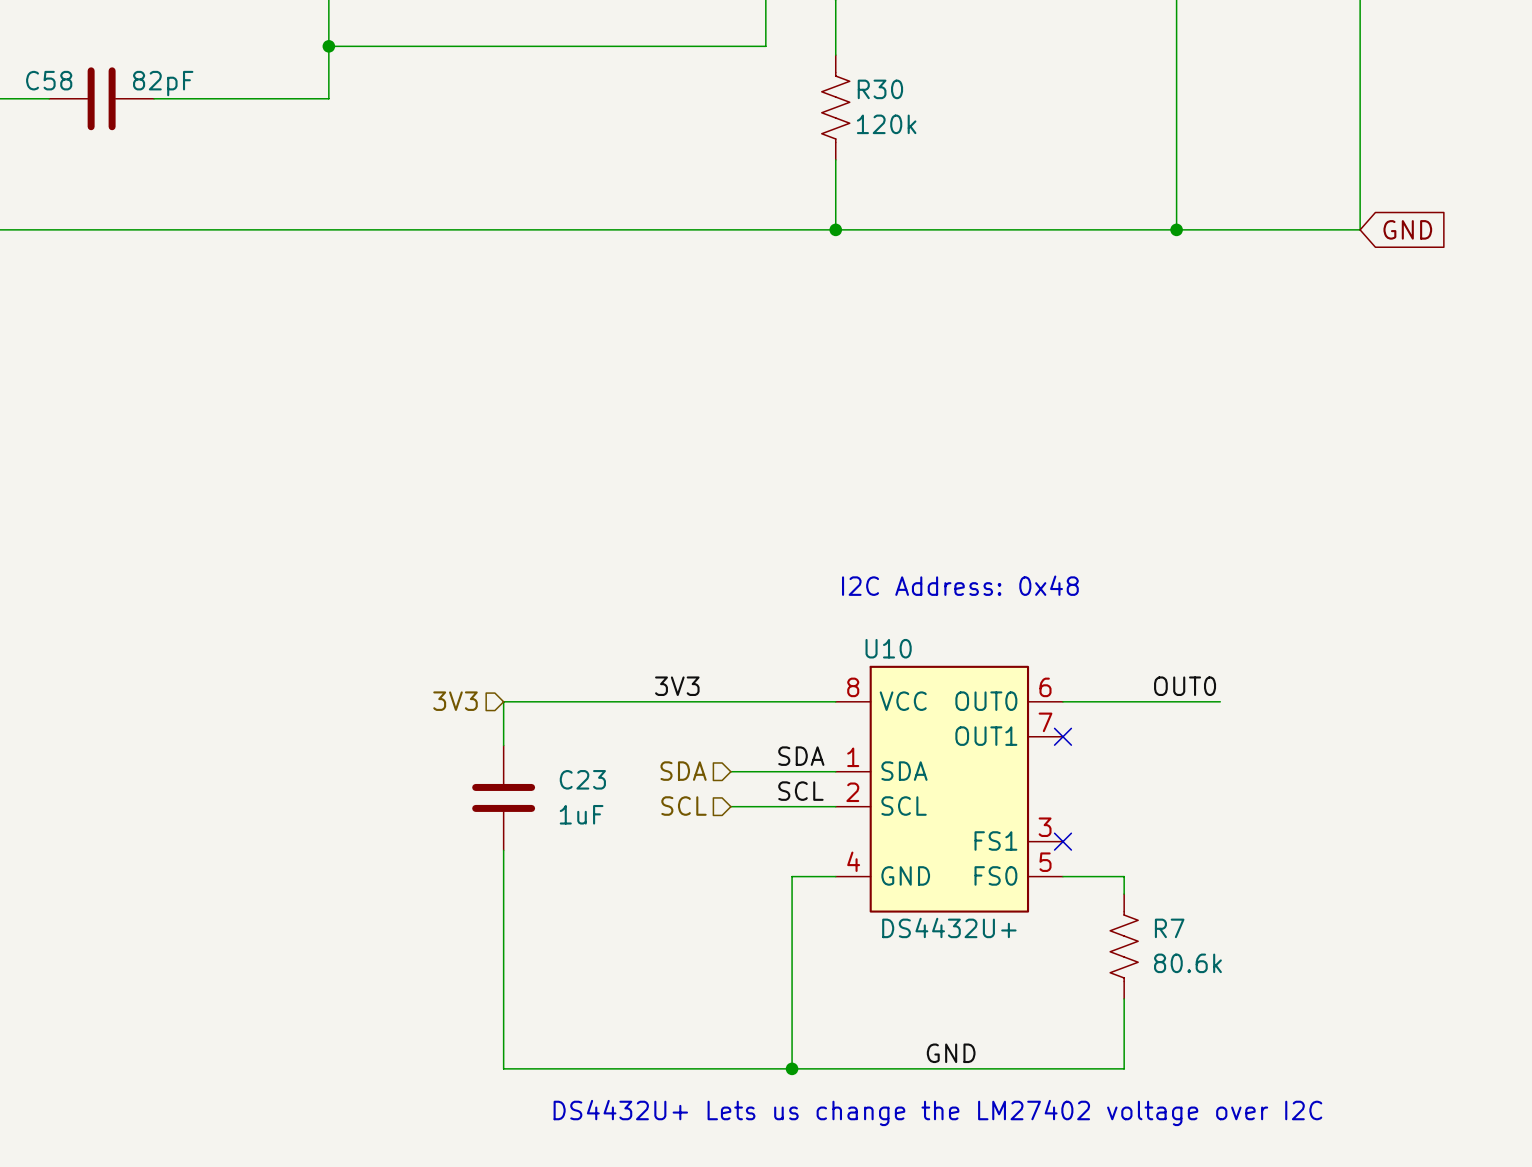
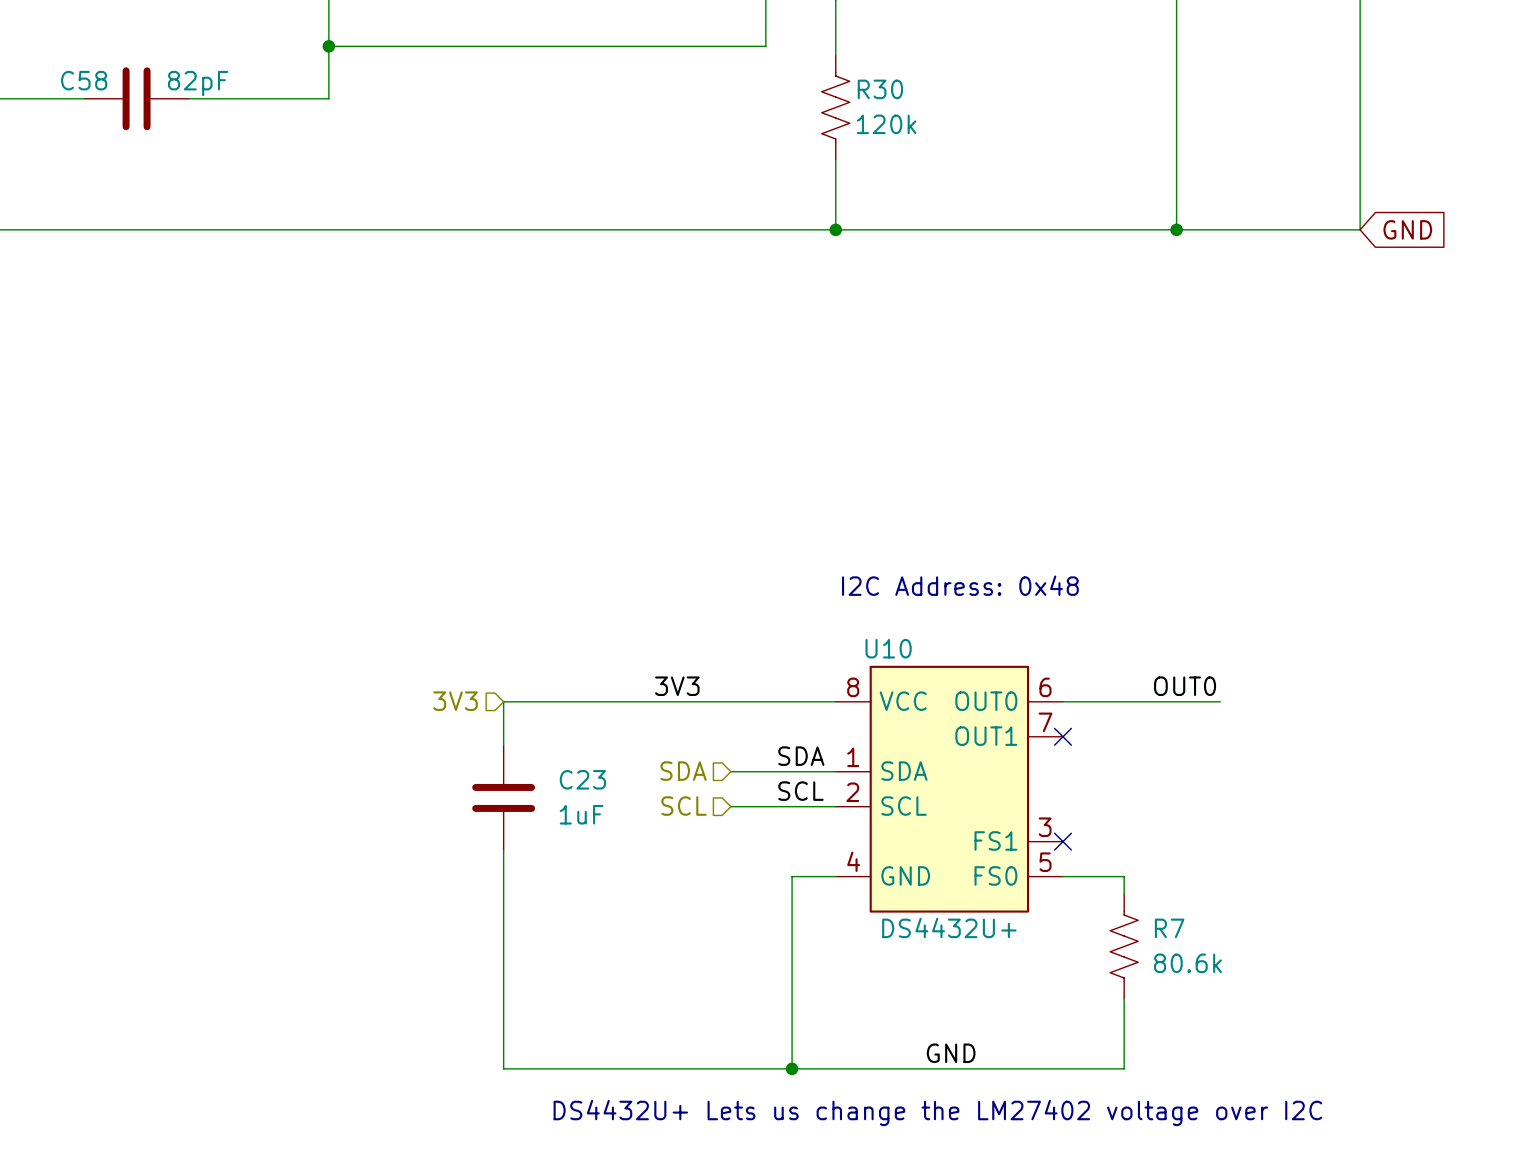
C58 position: (101, 98) -> (136, 98)

